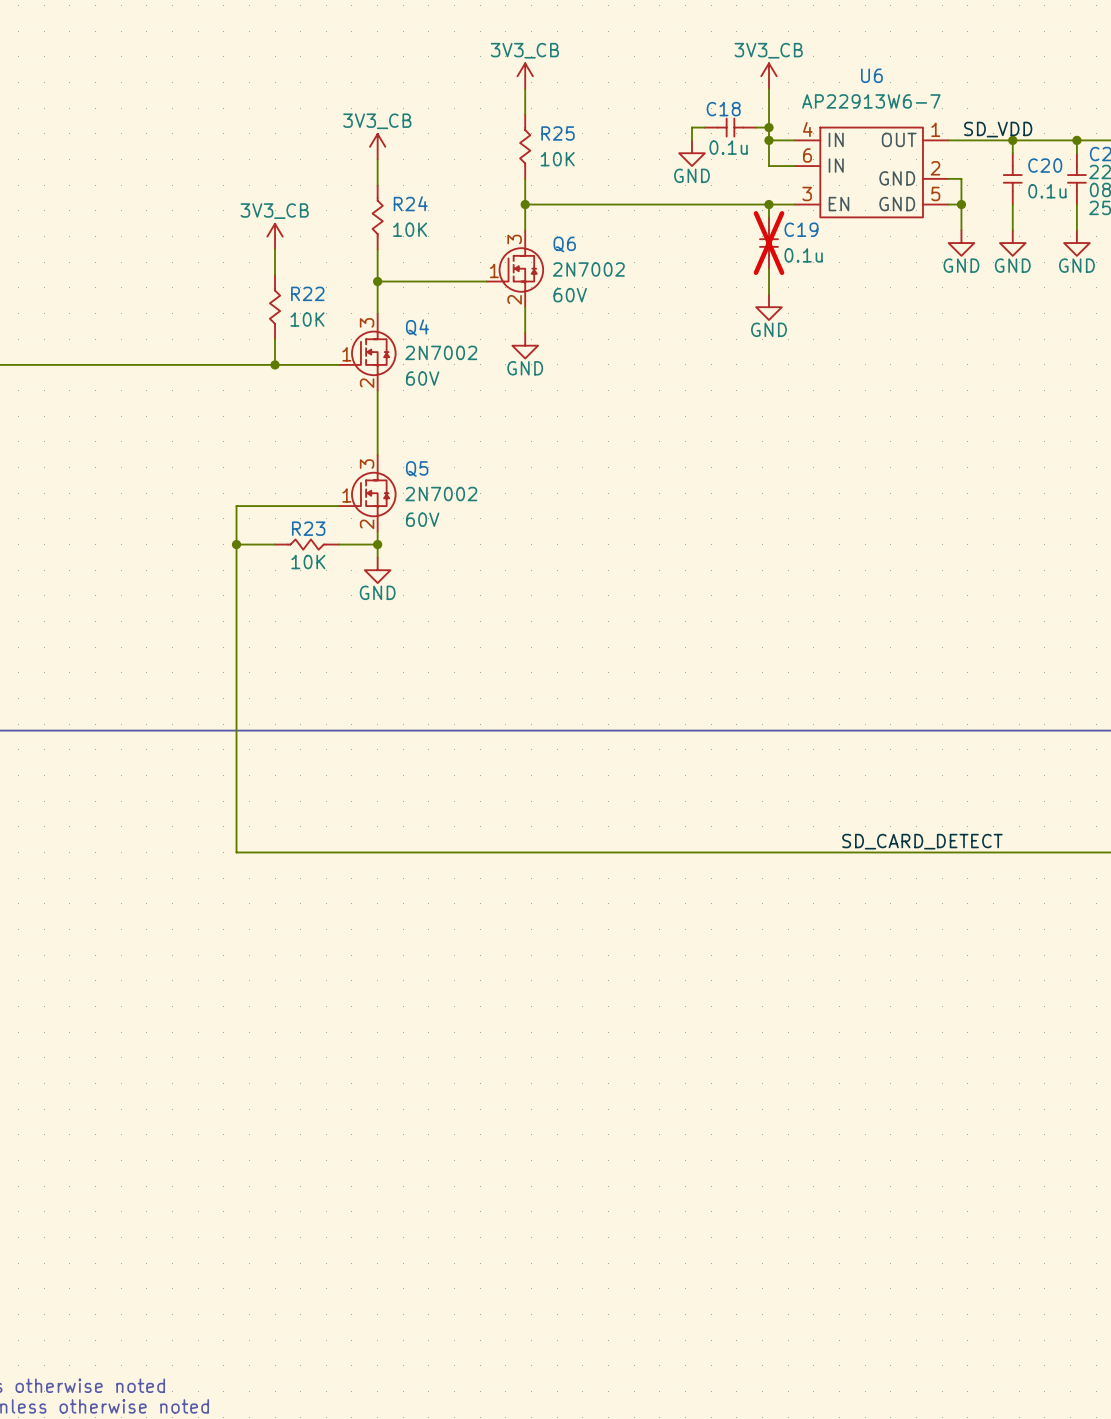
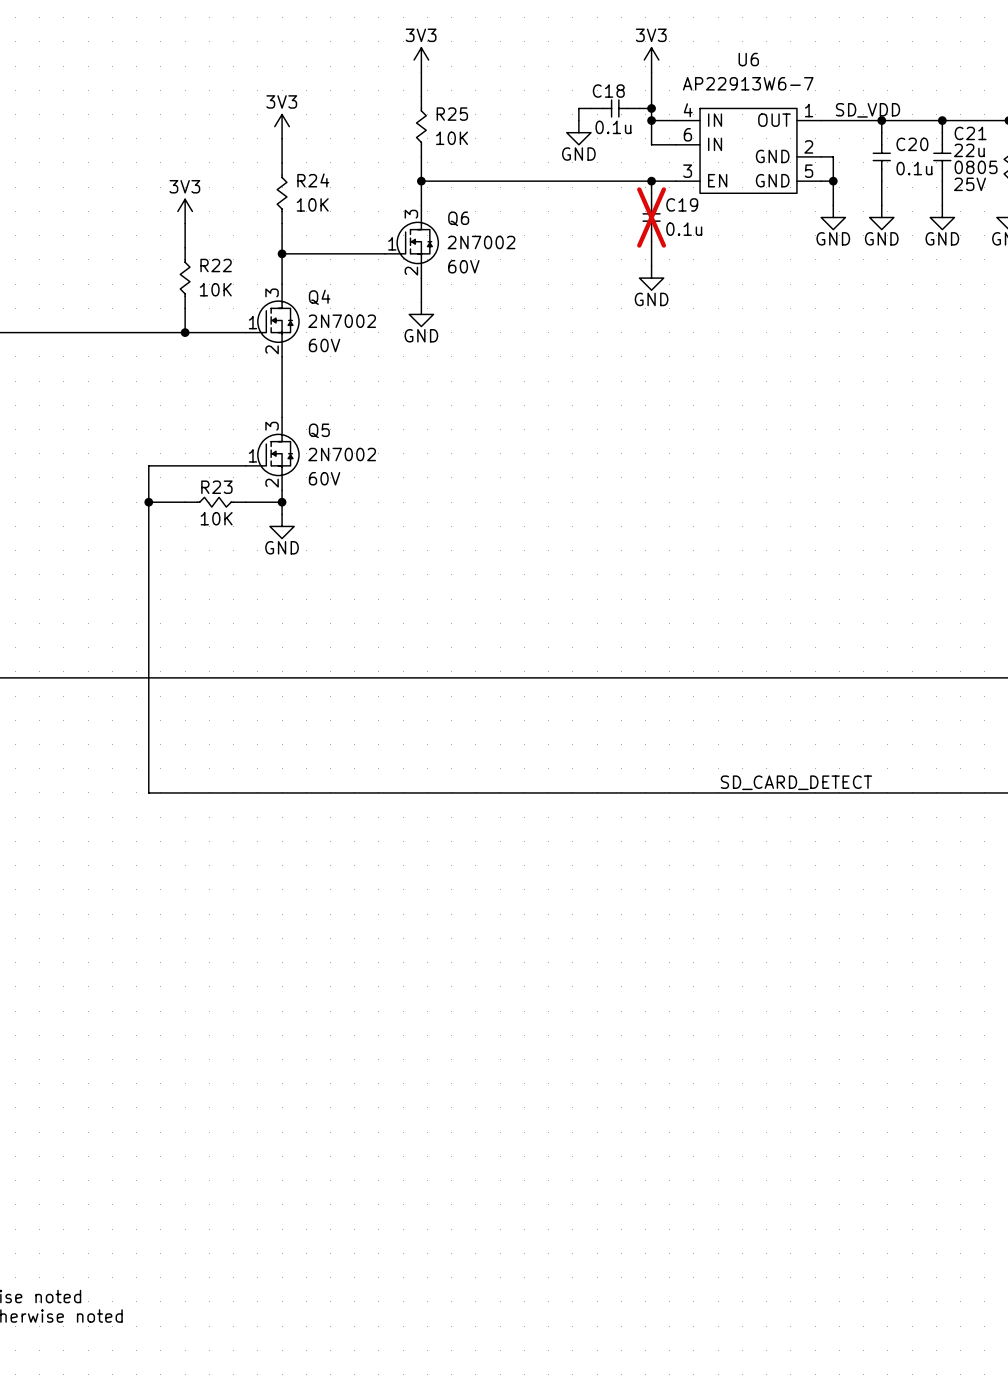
power symbol: 3V3_CB (525, 76) -> 3V3 (421, 60)
power symbol: 3V3_CB (768, 76) -> 3V3 (651, 60)
power symbol: 3V3_CB (377, 146) -> 3V3 (282, 126)
power symbol: 3V3_CB (275, 236) -> 3V3 (185, 211)

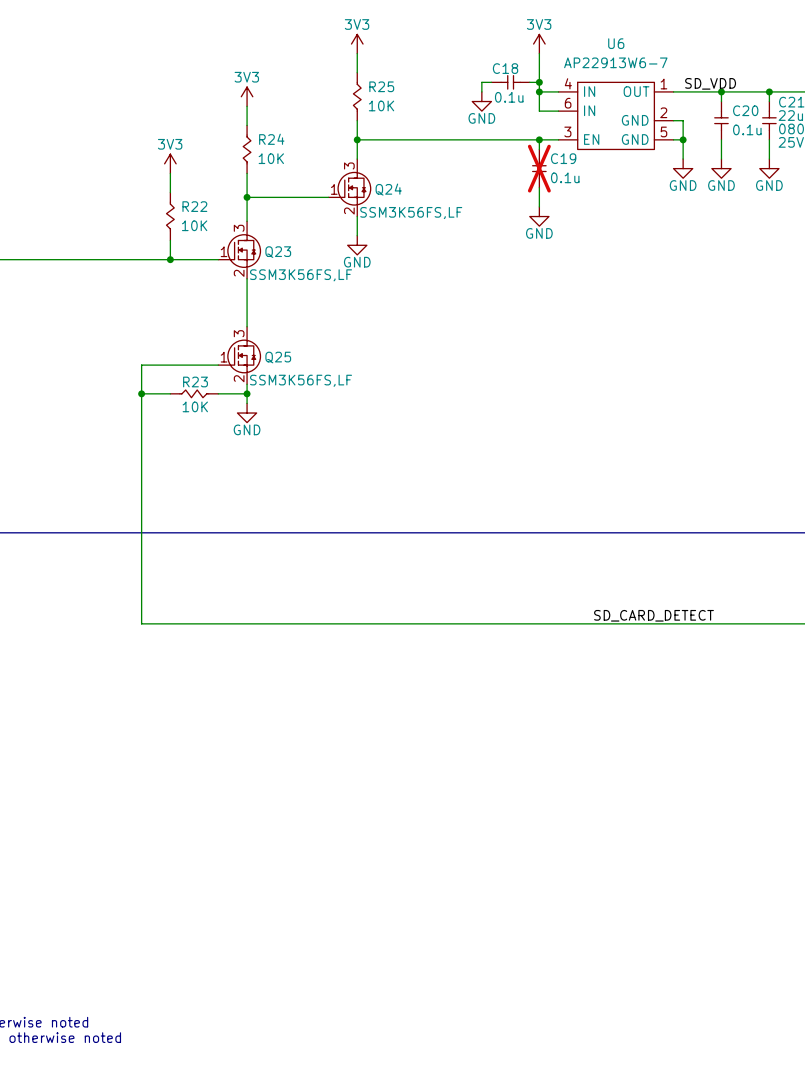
Q6 name: Q6 (458, 218) -> Q24 (388, 189)
Q6 value: 2N7002 (481, 242) -> SSM3K56FS,LF (411, 213)
Q6 text: 60V (463, 266) -> none
Q4 name: Q4 (319, 297) -> Q23 (278, 252)
Q4 value: 2N7002 (342, 321) -> SSM3K56FS,LF (301, 275)
Q4 text: 60V (324, 345) -> none
Q5 name: Q5 (319, 430) -> Q25 (278, 357)
Q5 value: 2N7002 (342, 454) -> SSM3K56FS,LF (301, 380)
Q5 text: 60V (324, 478) -> none

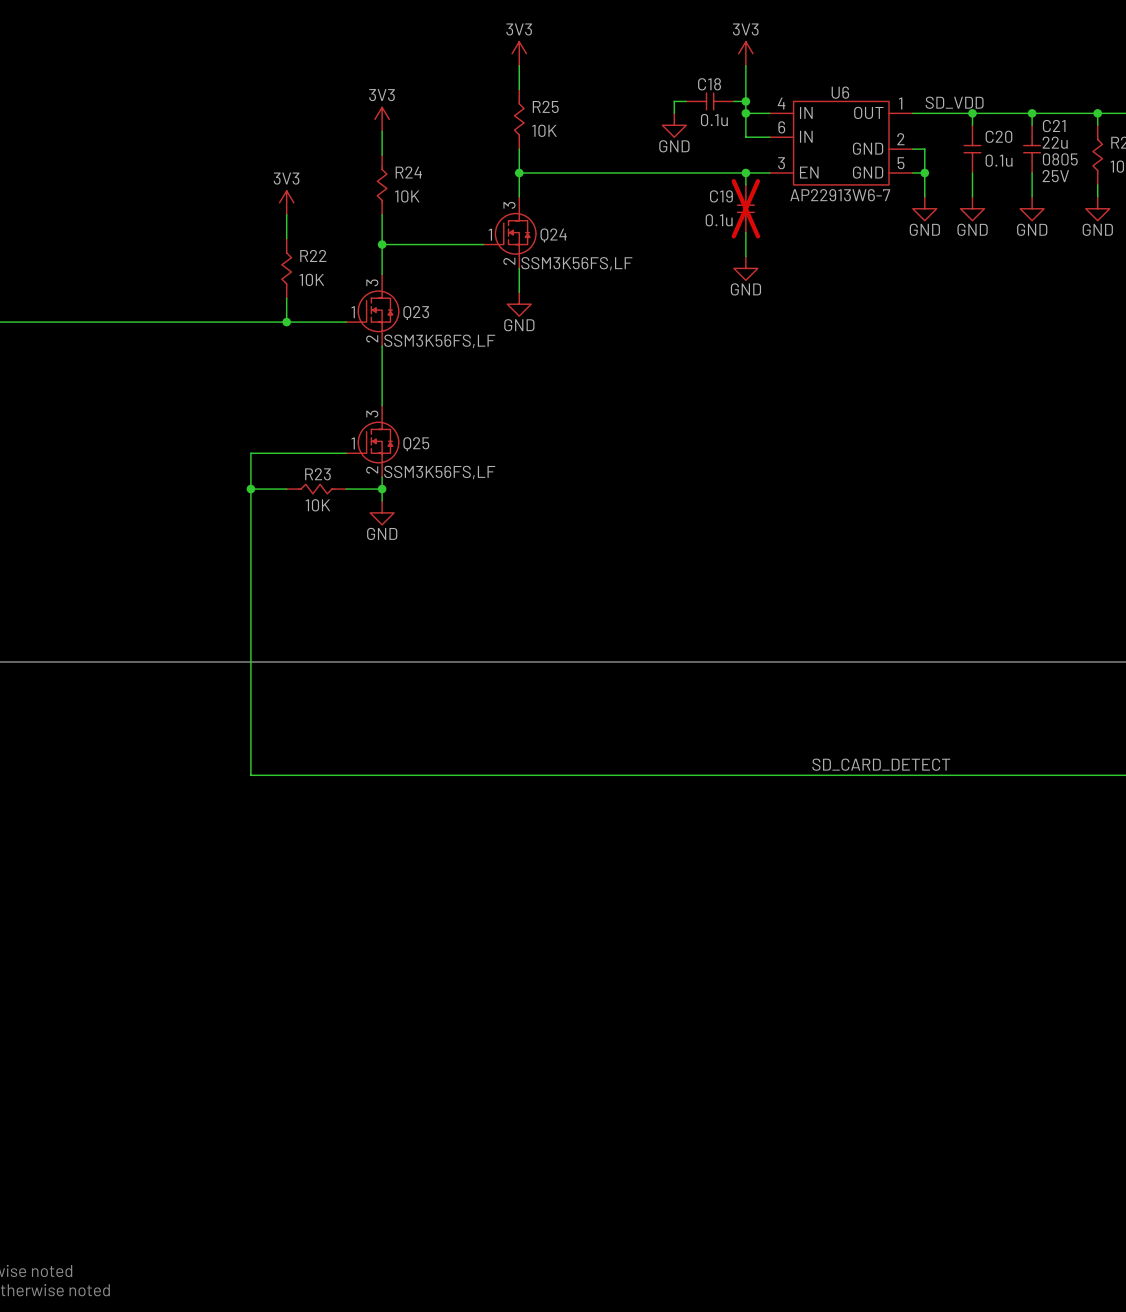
U6 name position: U6 (616, 43) -> U6 (840, 92)
U6 value position: AP22913W6-7 (615, 62) -> AP22913W6-7 (840, 195)
C19 name position: C19 (563, 158) -> C19 (721, 196)
C19 value position: 0.1u (565, 177) -> 0.1u (719, 220)

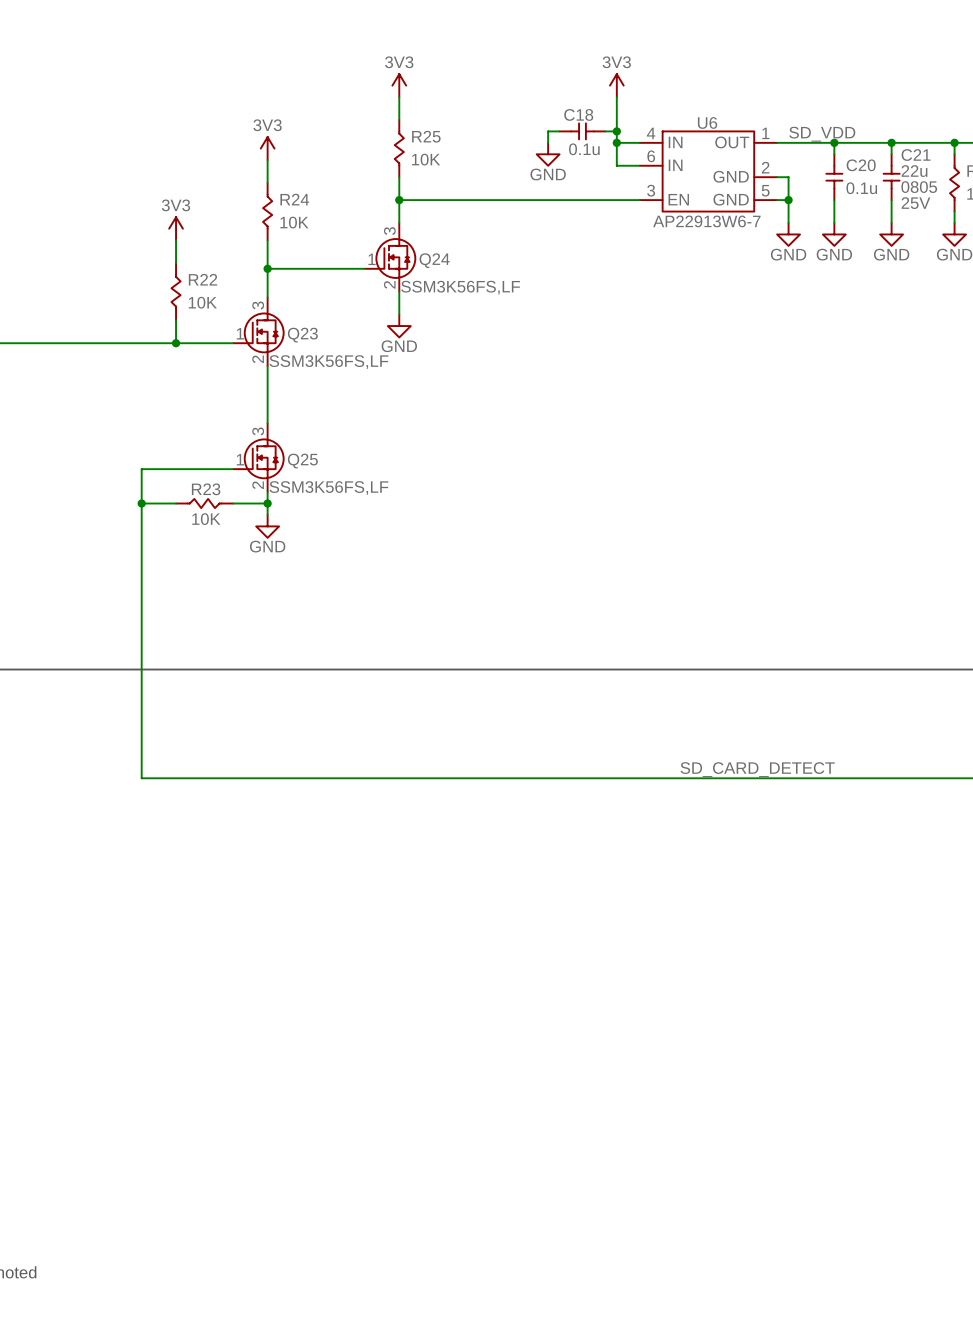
wire: (745, 172) (745, 184) -> none
junction: (745, 172) -> none
C19: 0.1u (745, 208) -> none
wire: (745, 232) (745, 256) -> none
power symbol: GND (745, 268) -> none

